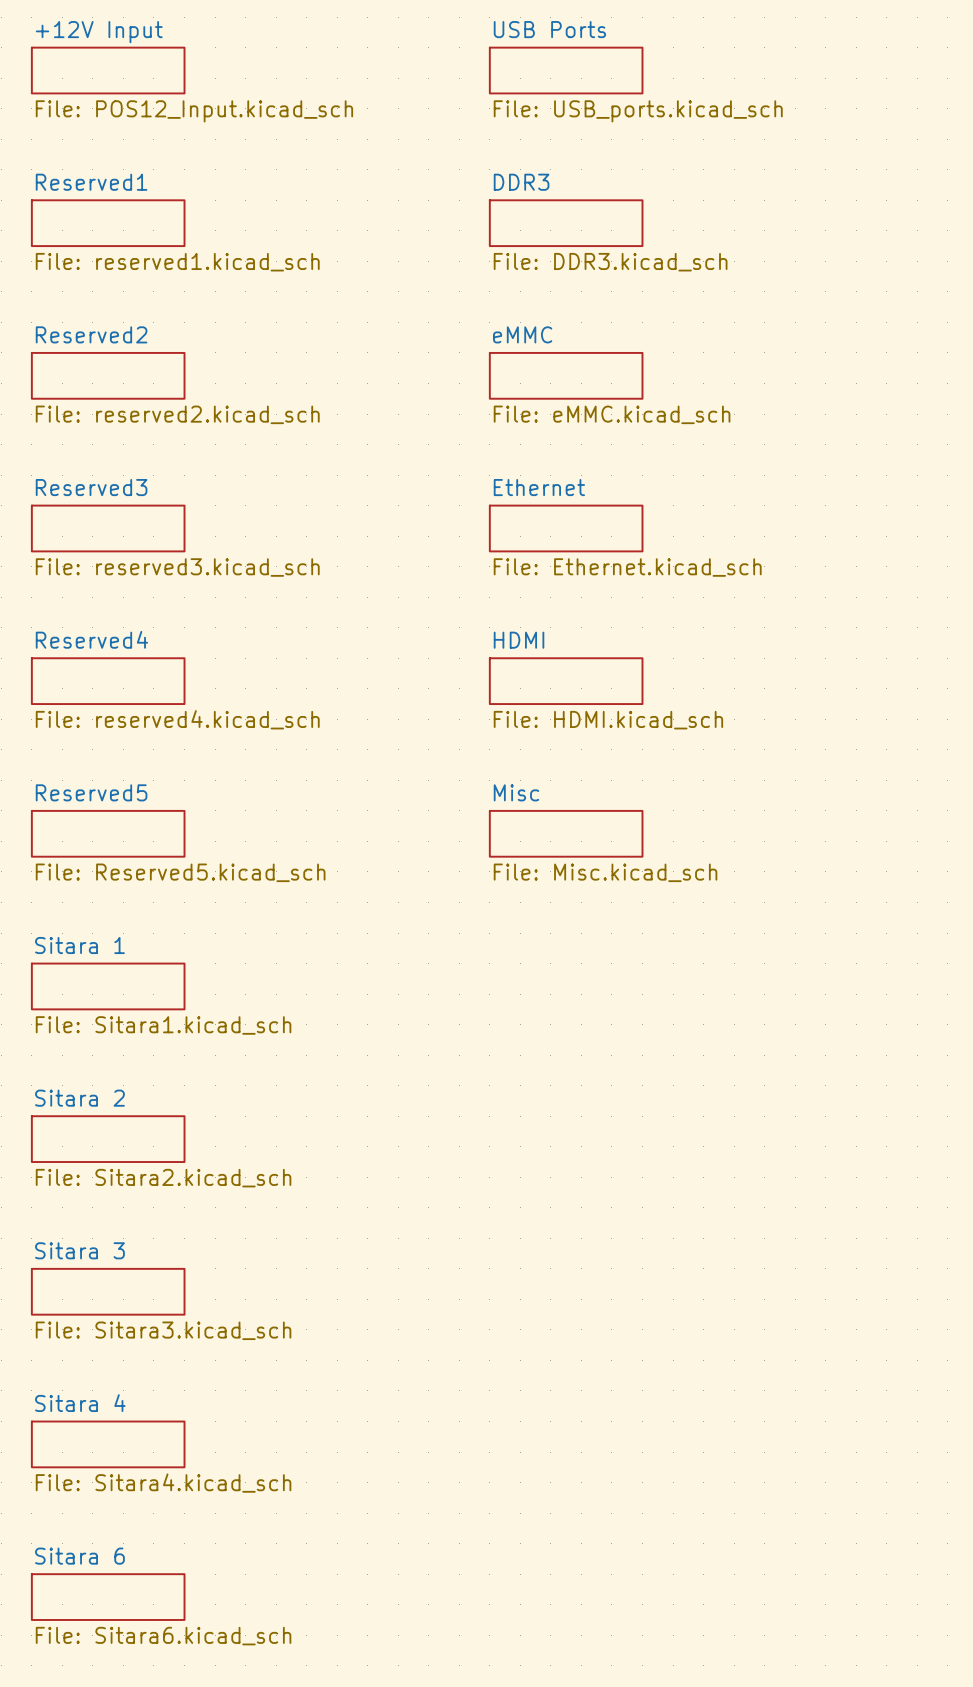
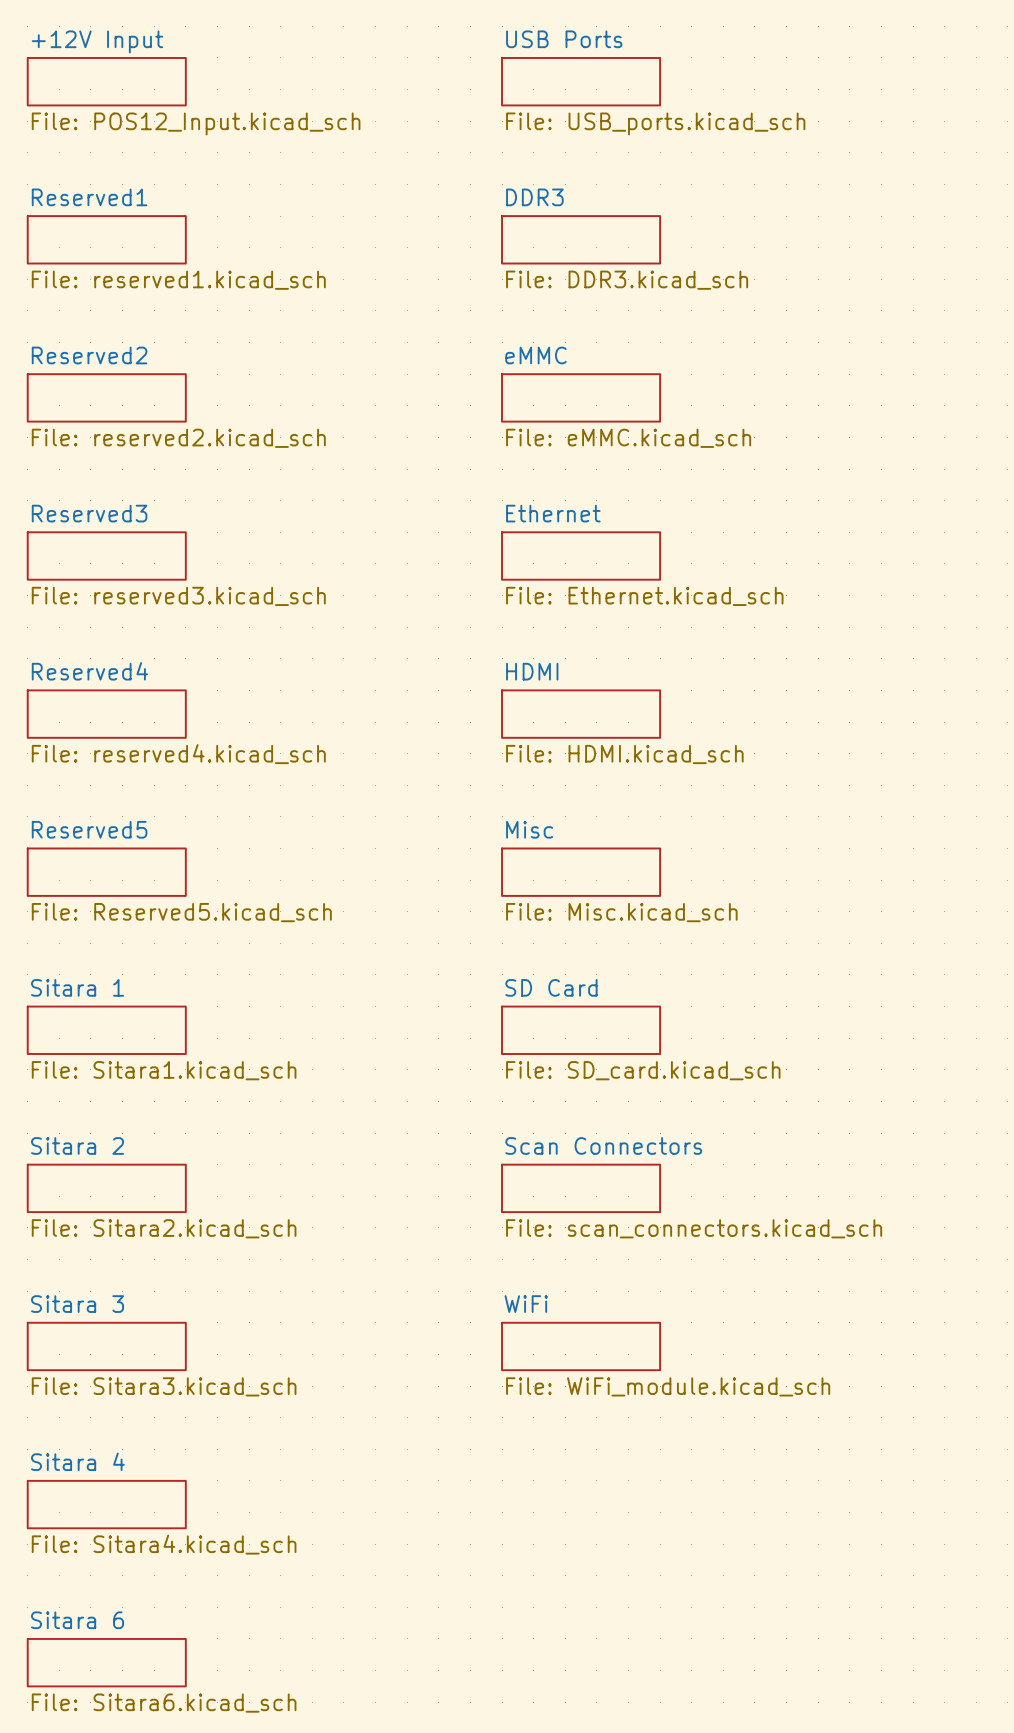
sheet SD Card: none -> File: SD_card.kicad_sch (581, 1030)
sheet Scan Connectors: none -> File: scan_connectors.kicad_sch (581, 1188)
sheet WiFi: none -> File: WiFi_module.kicad_sch (581, 1346)

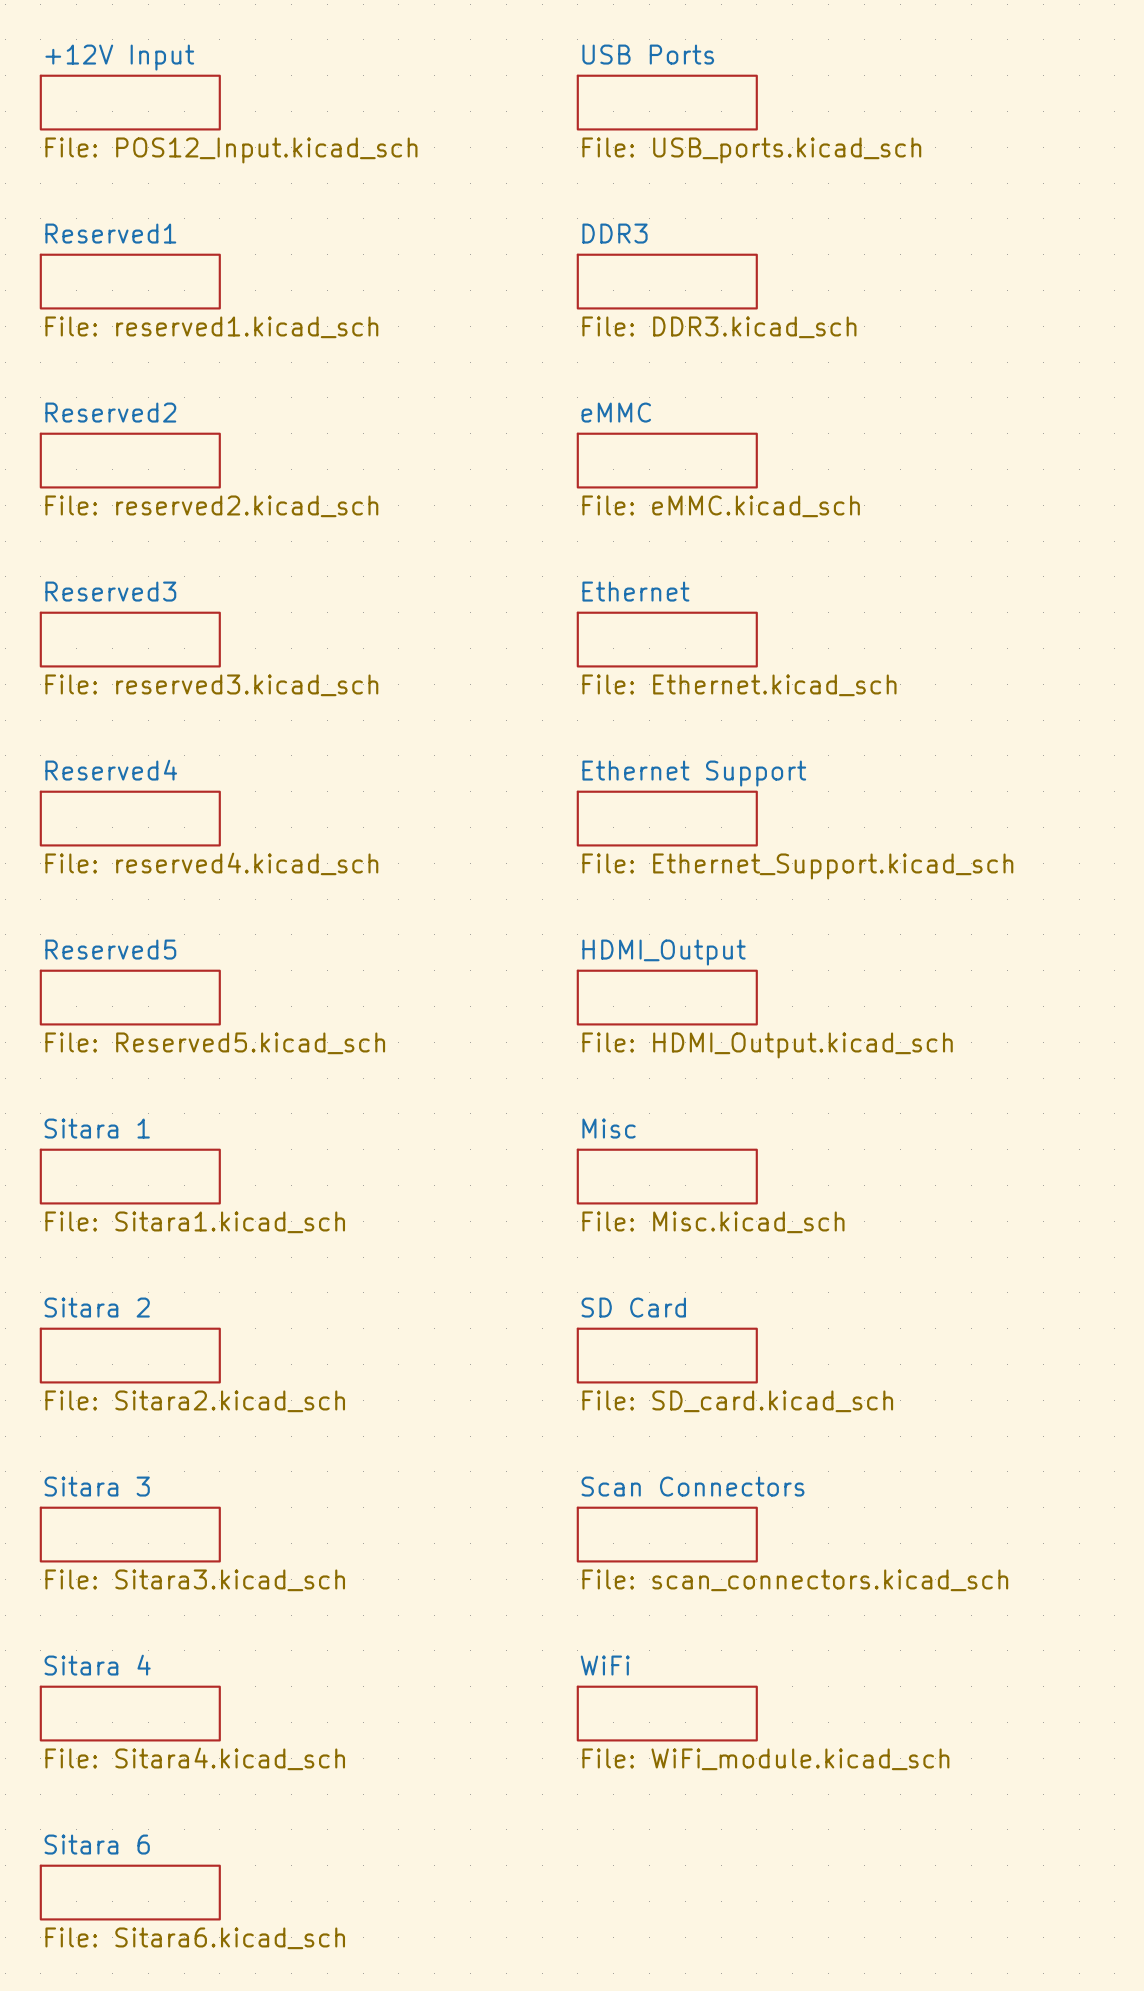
sheet HDMI name: HDMI (532, 671) -> Ethernet Support (694, 773)
sheet HDMI value: File: HDMI.kicad_sch (624, 754) -> File: Ethernet_Support.kicad_sch (797, 866)
sheet Misc name: Misc (529, 829) -> HDMI_Output (664, 952)
sheet Misc value: File: Misc.kicad_sch (621, 912) -> File: HDMI_Output.kicad_sch (767, 1045)
sheet SD Card name: SD Card (551, 987) -> Misc (609, 1128)
sheet SD Card value: File: SD_card.kicad_sch (643, 1070) -> File: Misc.kicad_sch (713, 1222)
sheet Scan Connectors name: Scan Connectors (603, 1145) -> SD Card (633, 1307)
sheet Scan Connectors value: File: scan_connectors.kicad_sch (694, 1228) -> File: SD_card.kicad_sch (737, 1401)
sheet WiFi name: WiFi (526, 1304) -> Scan Connectors (693, 1486)
sheet WiFi value: File: WiFi_module.kicad_sch (668, 1386) -> File: scan_connectors.kicad_sch (795, 1580)
sheet WiFi: none -> File: WiFi_module.kicad_sch (667, 1713)

